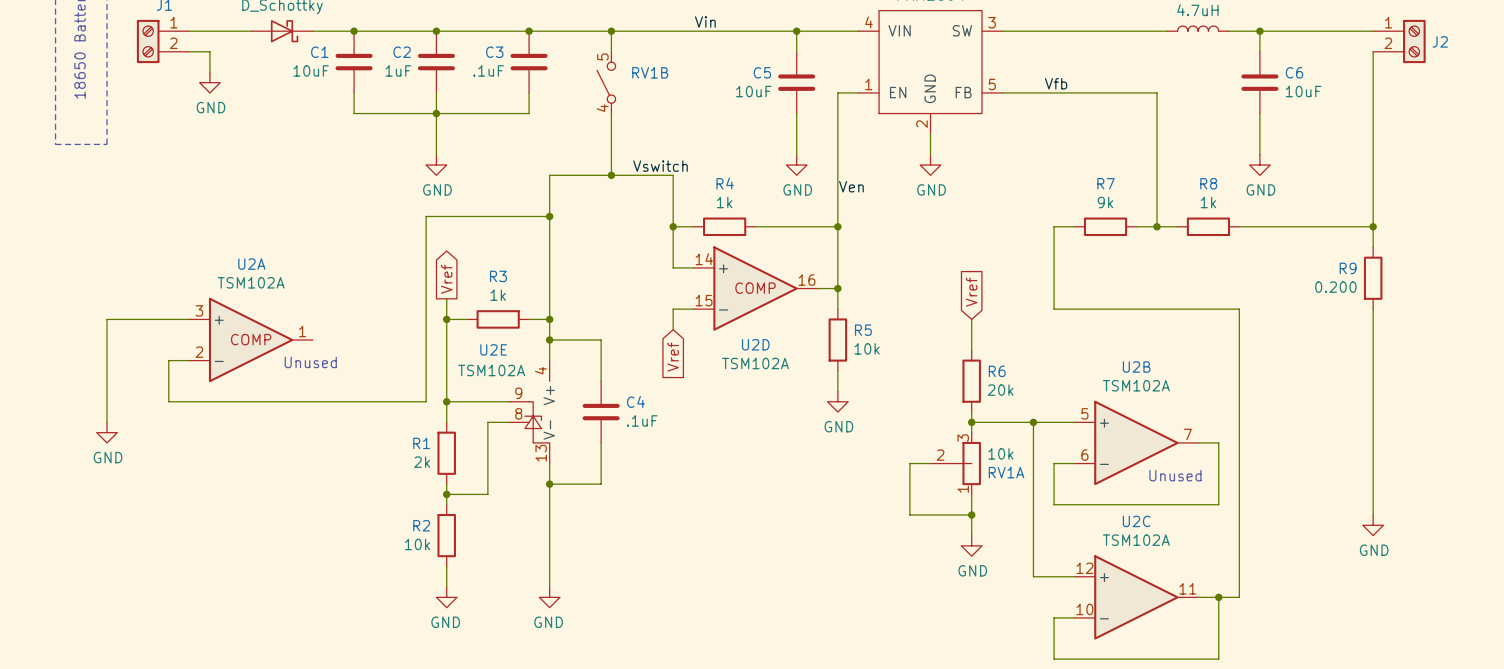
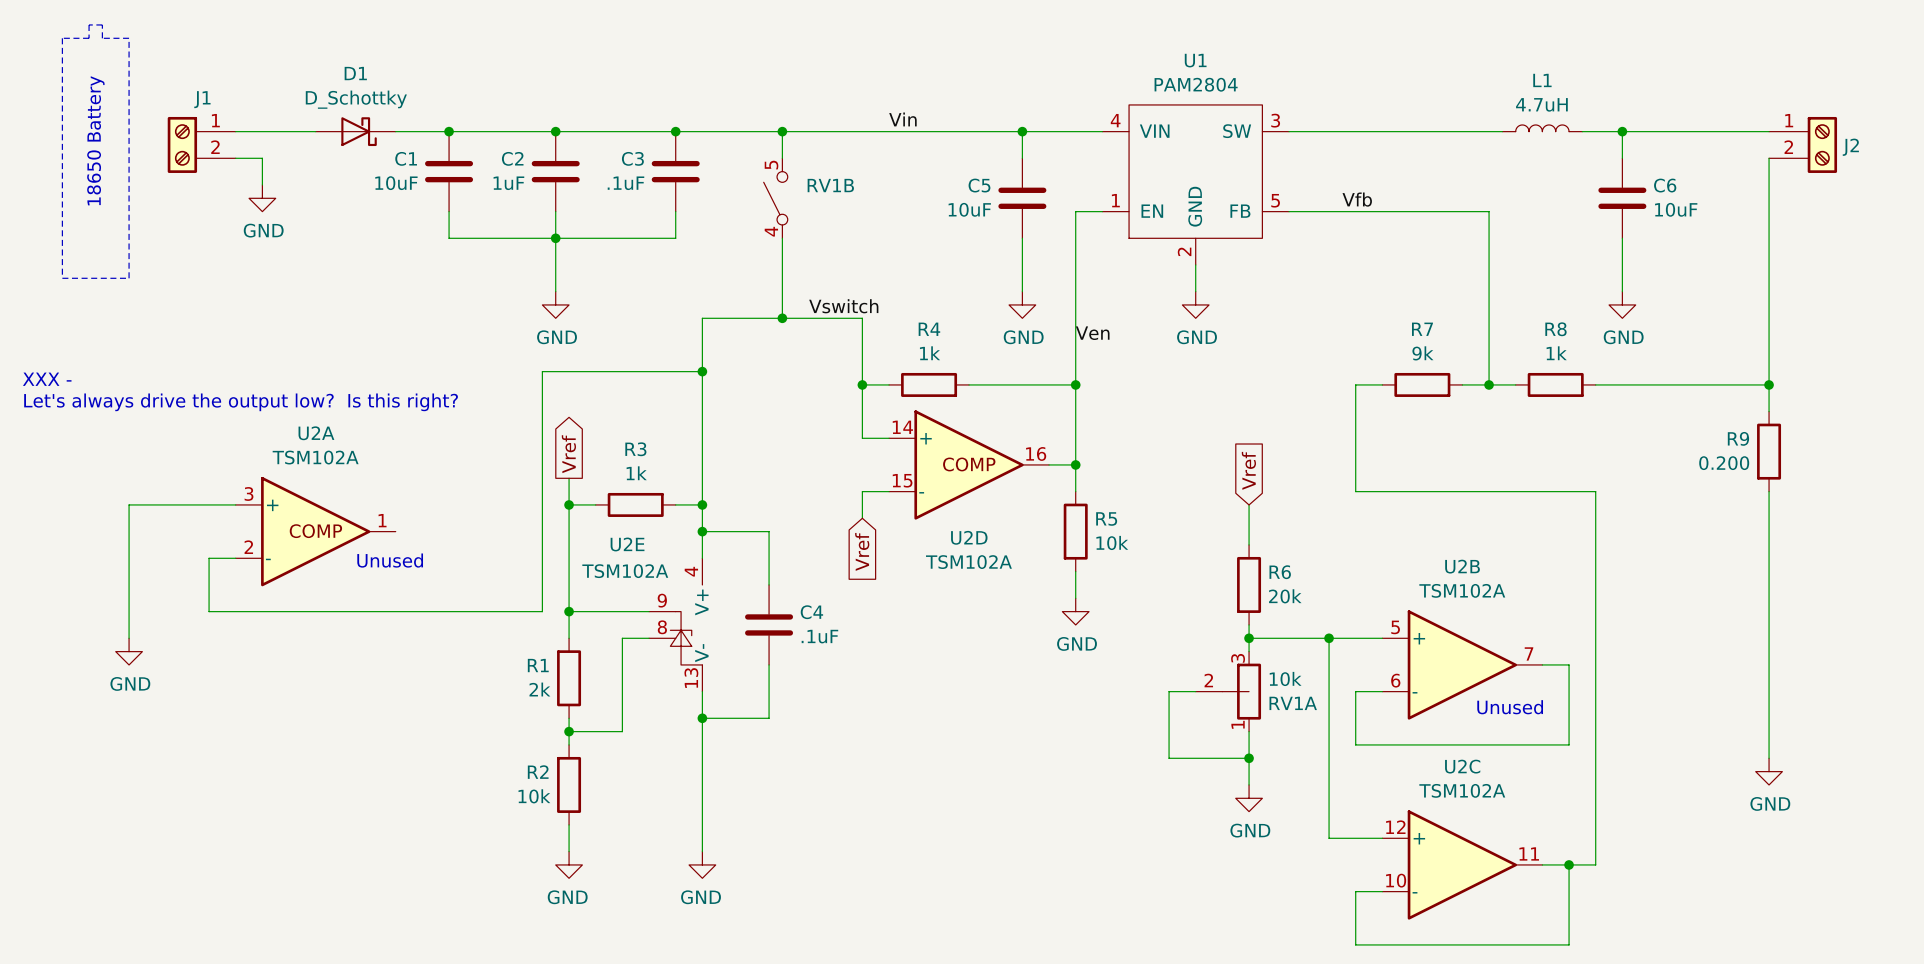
text: none -> XXX - (47, 379)
text: none -> Let's always drive the output low? Is this right? (241, 402)

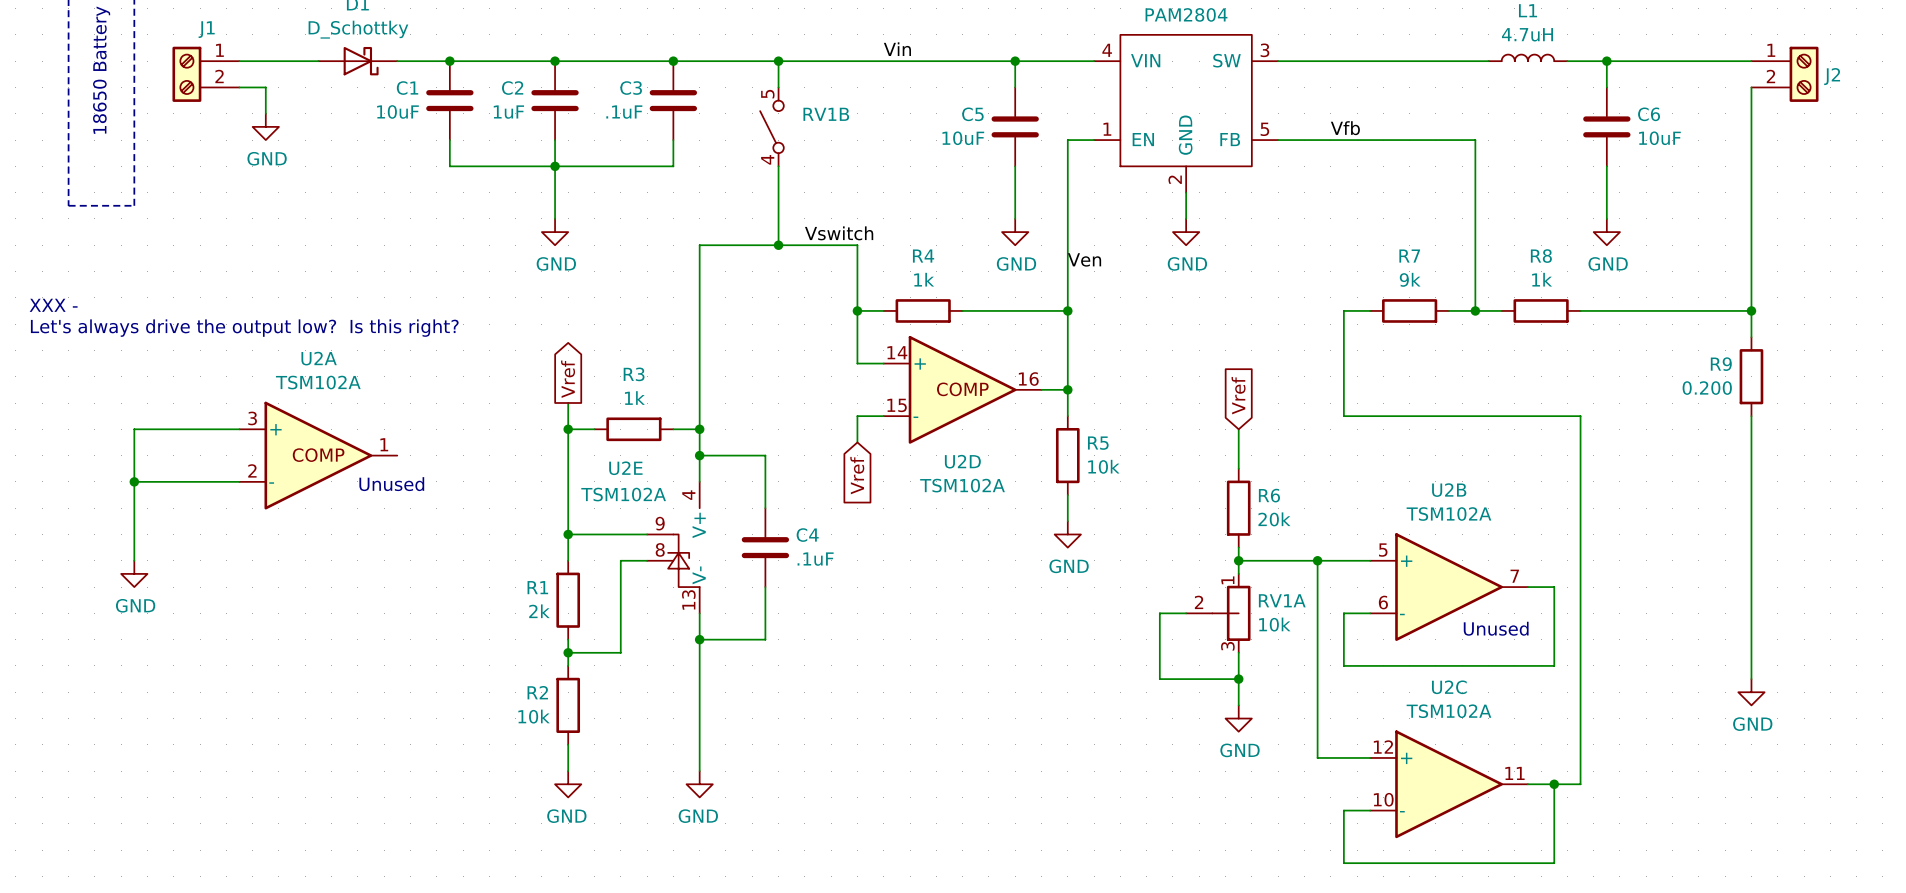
wire: (702, 371) (542, 371) (542, 611) (209, 611) (209, 558) -> (134, 481) (213, 481)
junction: (702, 371) -> none
junction: none -> (134, 481)
RV1A flip: as is (1241, 691) -> up-down (1231, 613)

